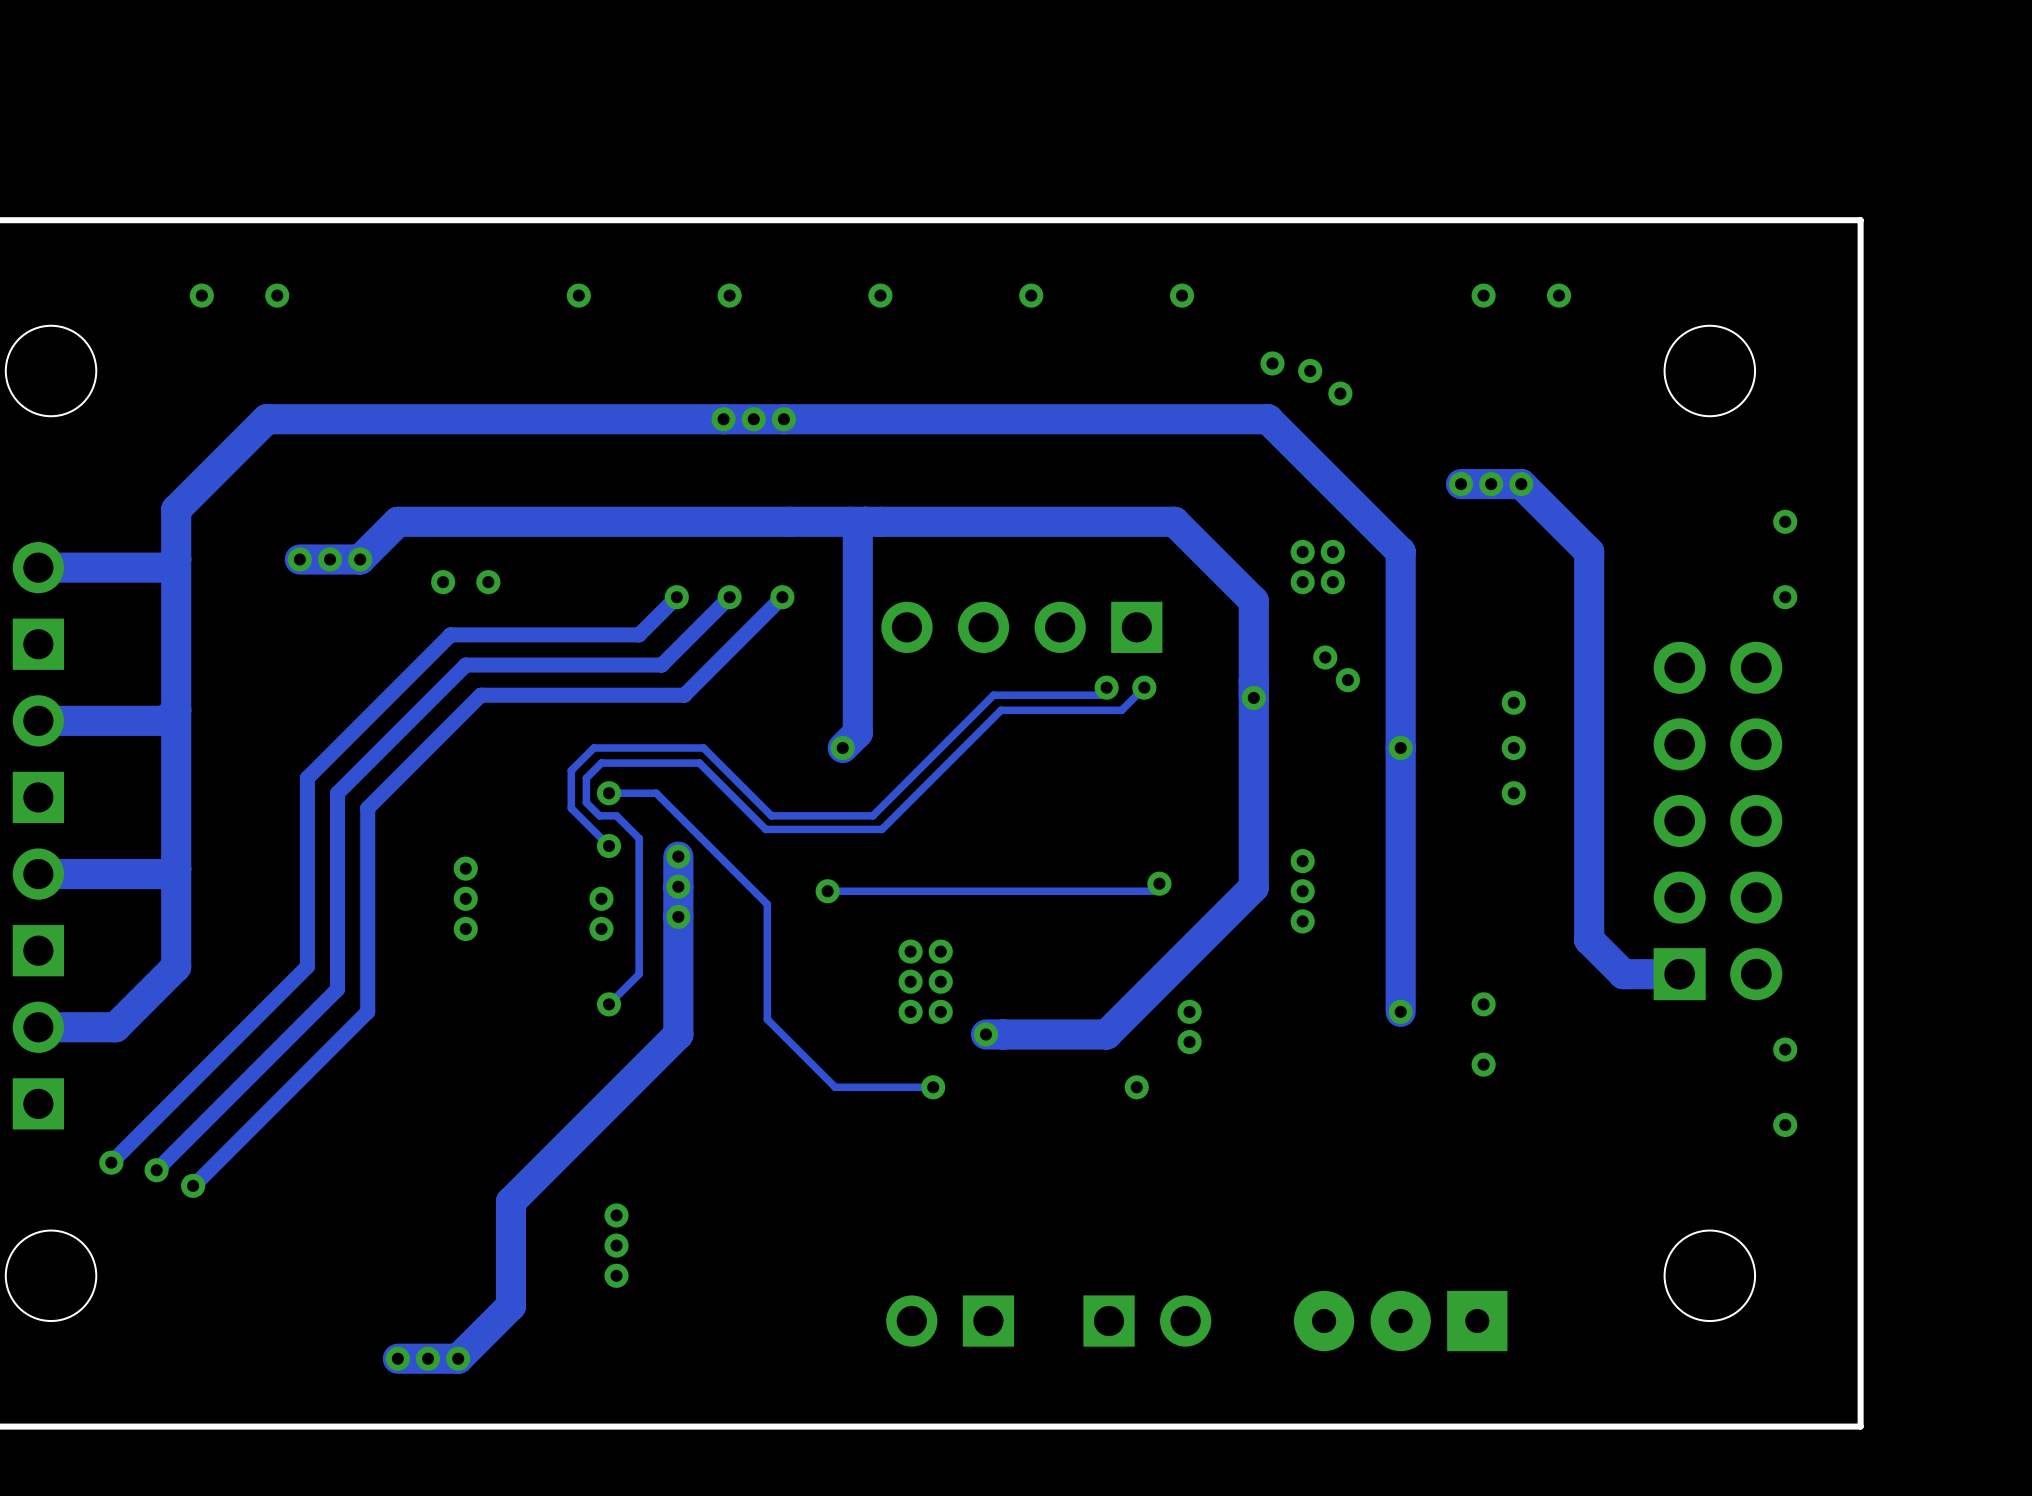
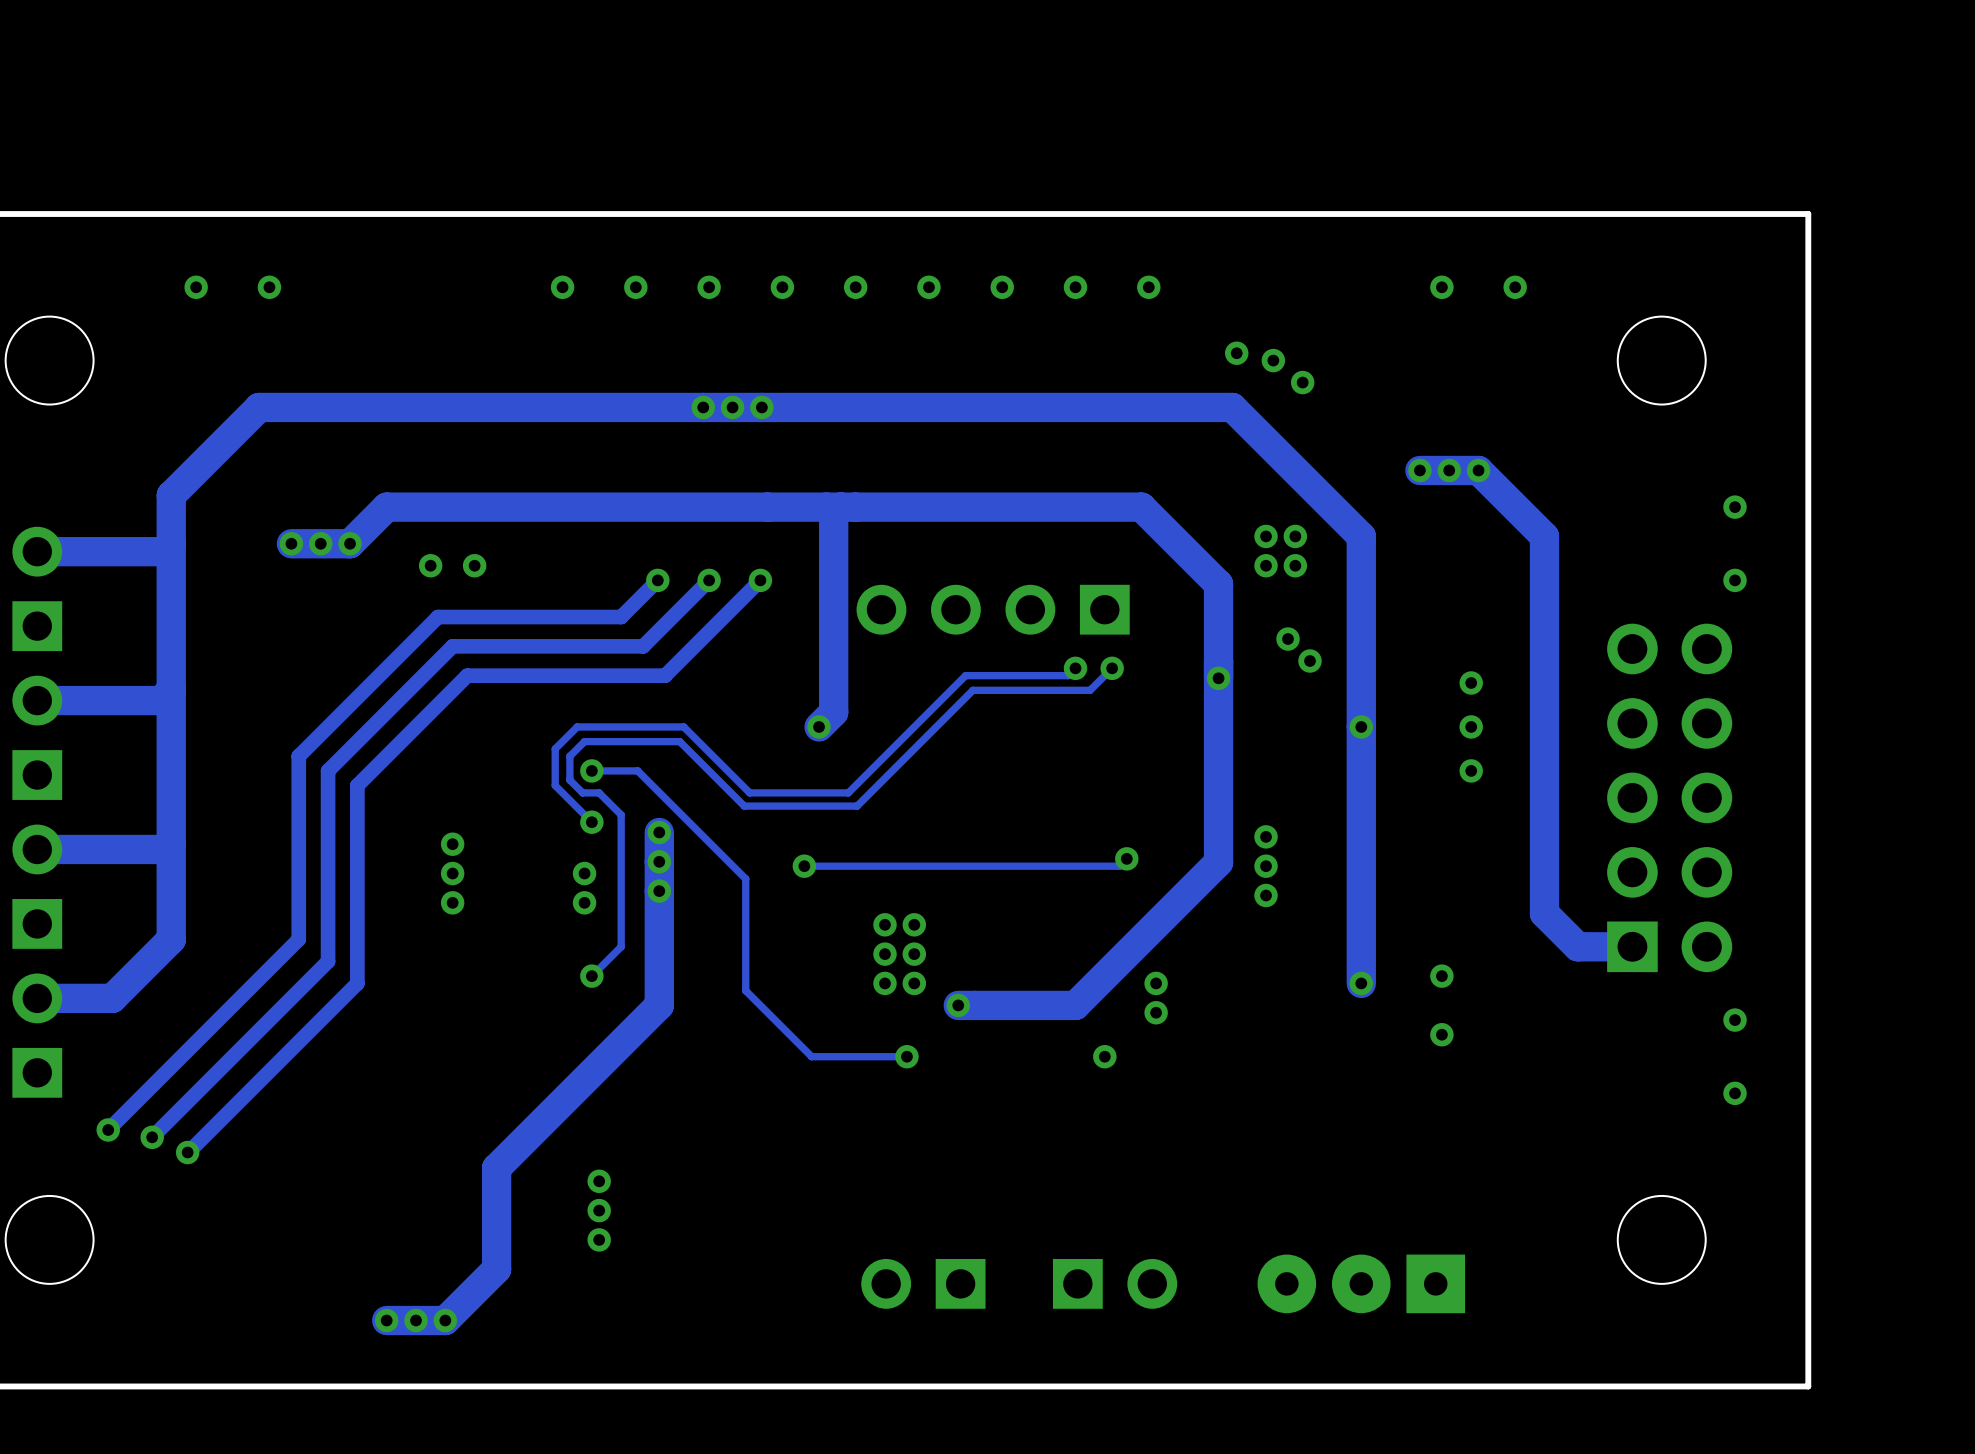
via: none -> (635, 287)
via: none -> (782, 287)
via: none -> (928, 287)
via: none -> (1075, 287)

